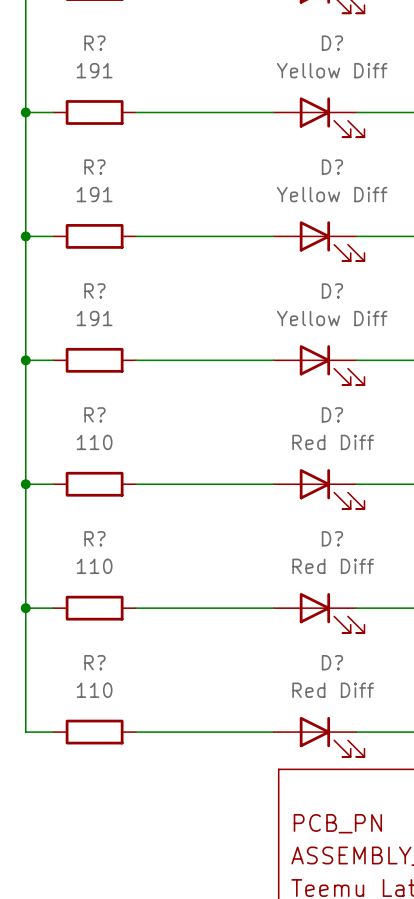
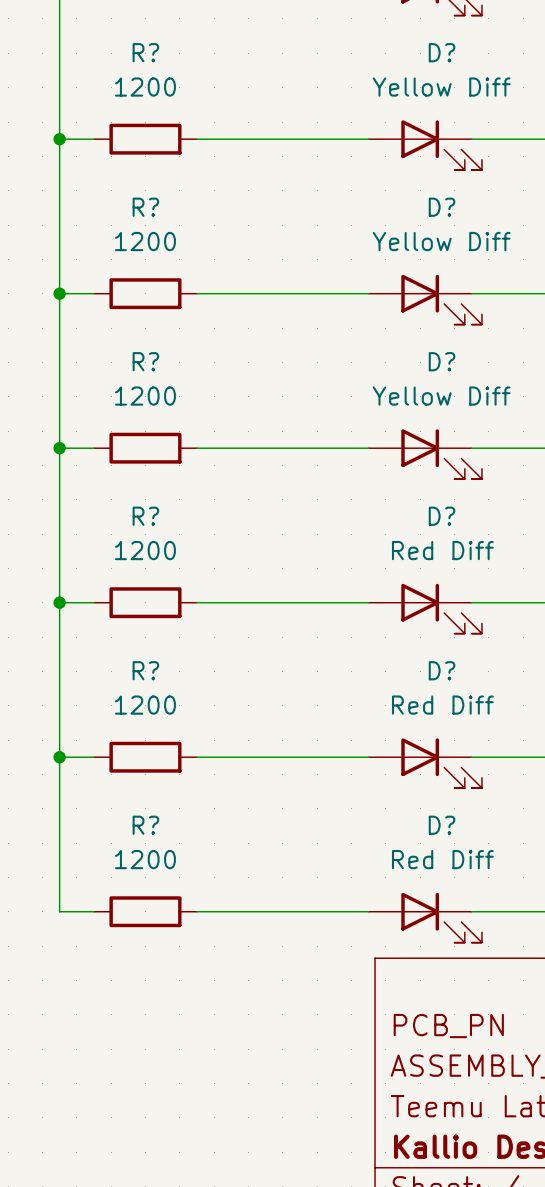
R? text: 191 (94, 70) -> 1200 (145, 87)
R? text: 191 (94, 194) -> 1200 (145, 241)
R? text: 191 (94, 318) -> 1200 (145, 396)
R? text: 110 (94, 442) -> 1200 (145, 550)
R? text: 110 (94, 566) -> 1200 (145, 705)
R? text: 110 (94, 690) -> 1200 (145, 859)

